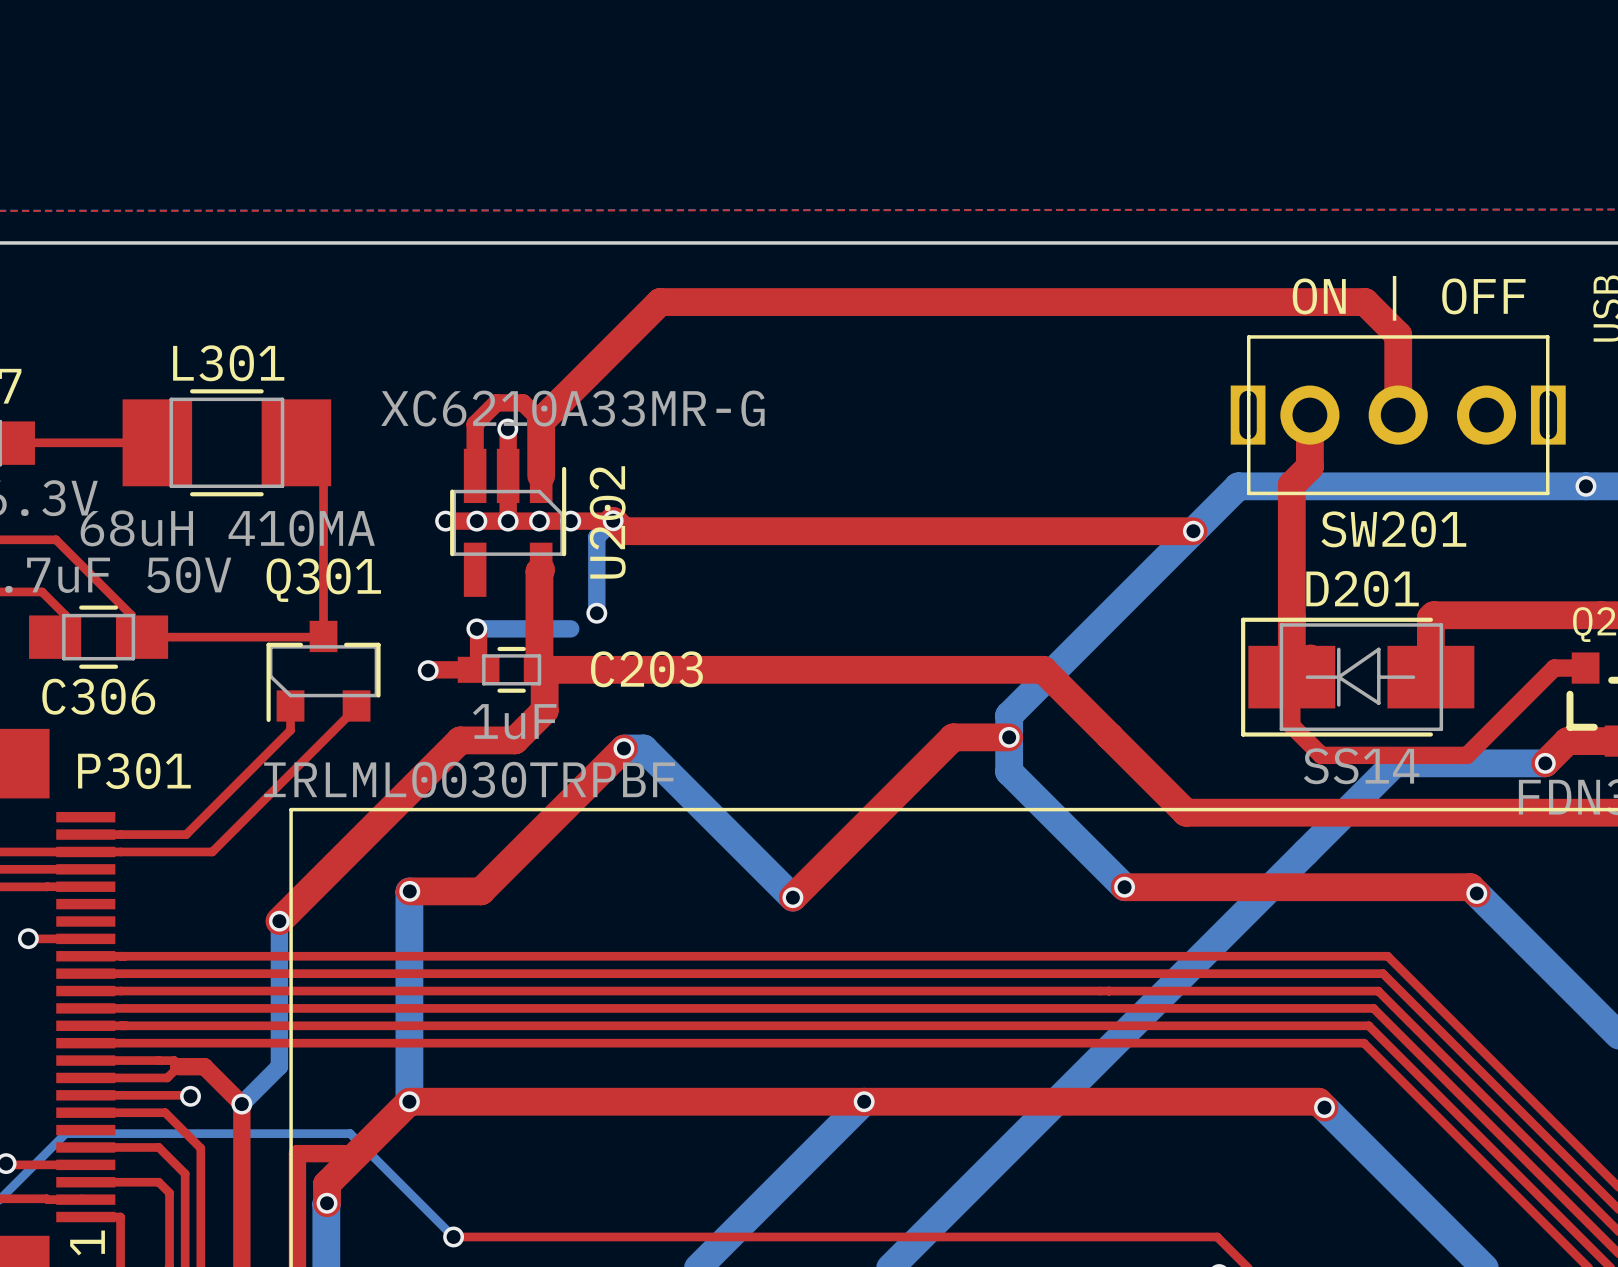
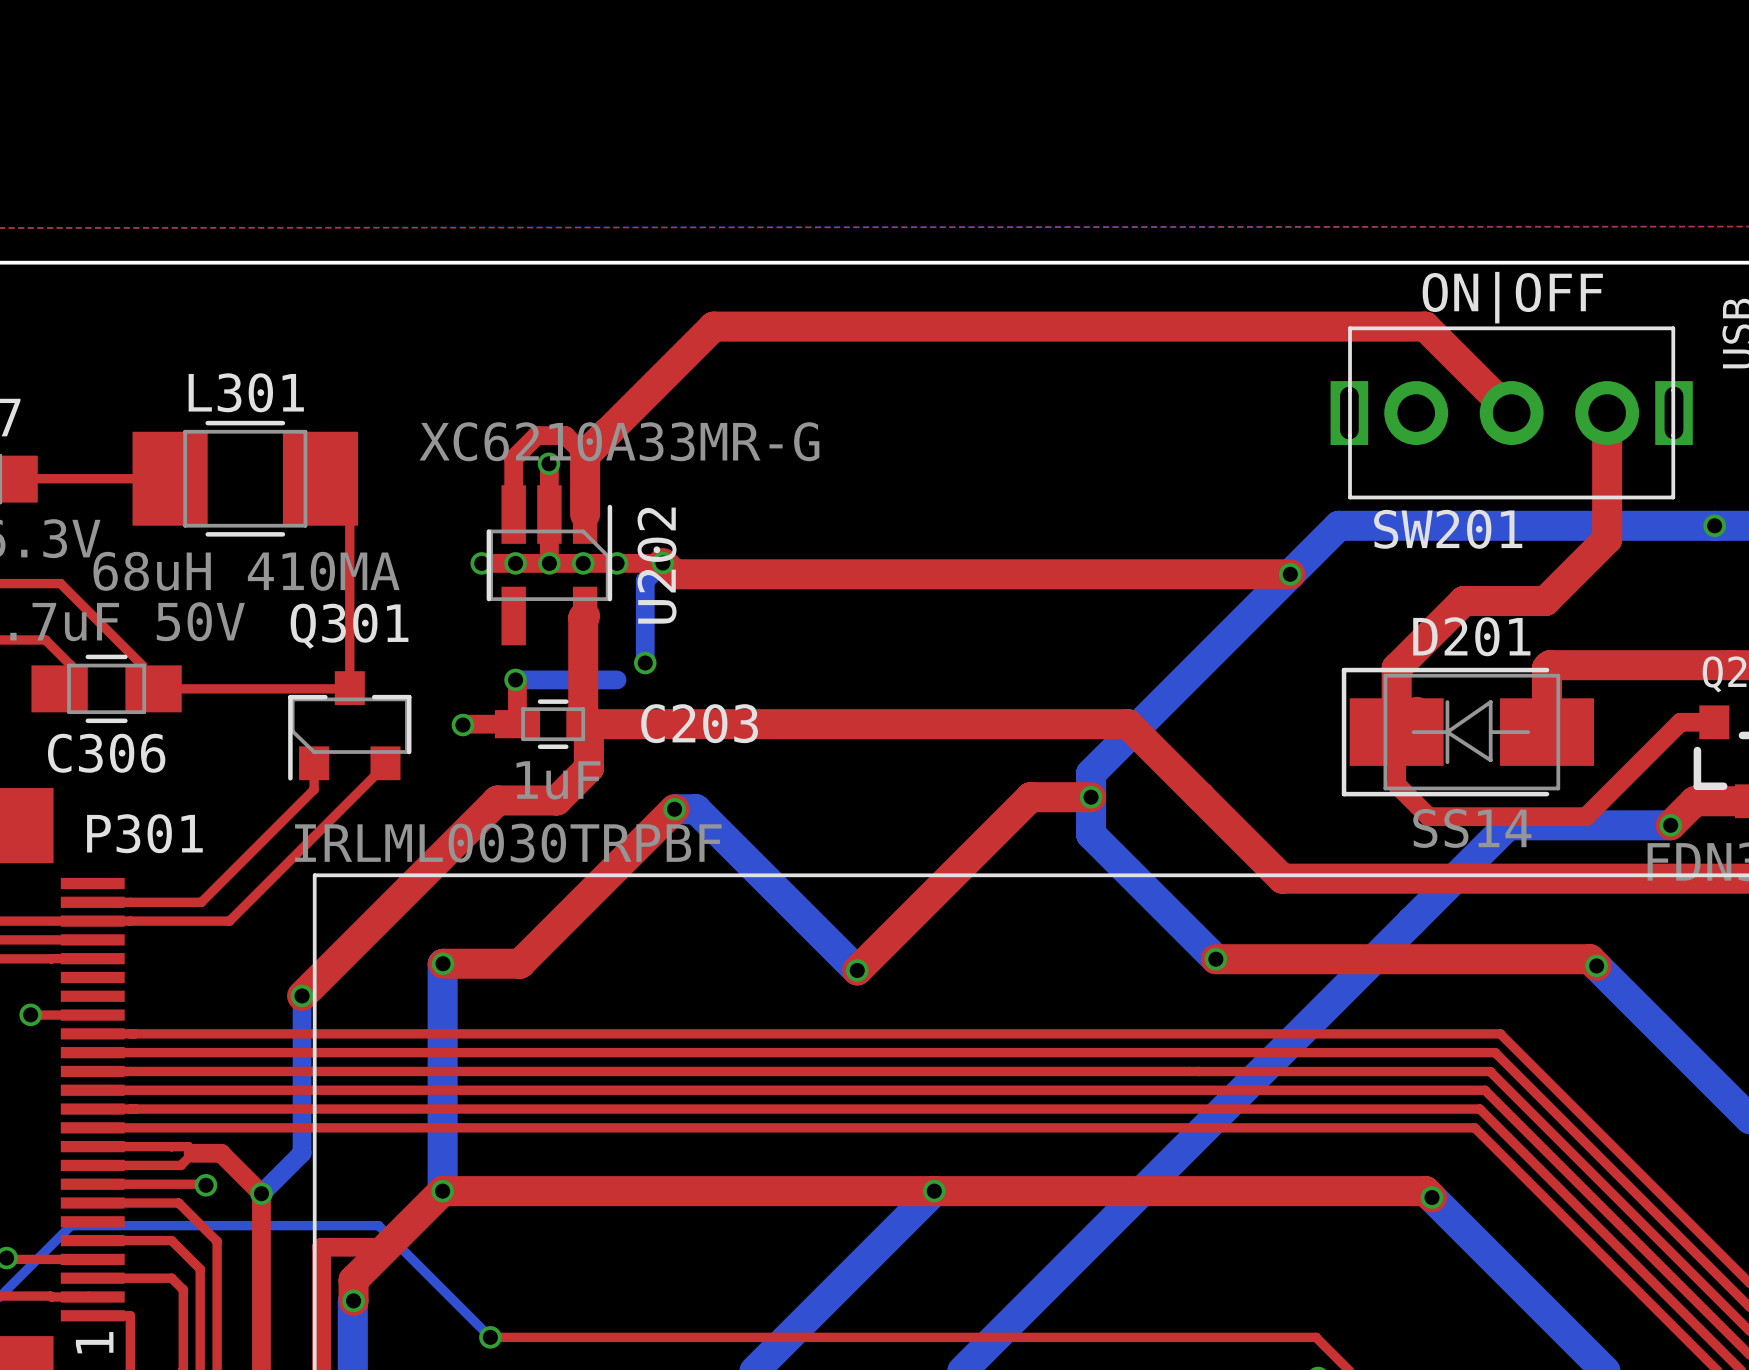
SW201 value: ON | OFF (1409, 298) -> ON|OFF (1512, 297)
top track: (1318, 302) (1365, 302) (1398, 335) (1398, 415) -> (1425, 326) (1511, 413)
top track: (1309, 415) (1309, 466) (1291, 484) (1291, 618) -> (1607, 413) (1607, 539) (1545, 600) (1463, 600) (1396, 668)
SW201 position: (1398, 415) -> (1511, 412)
SW201 name position: SW201 (1393, 529) -> SW201 (1448, 529)

